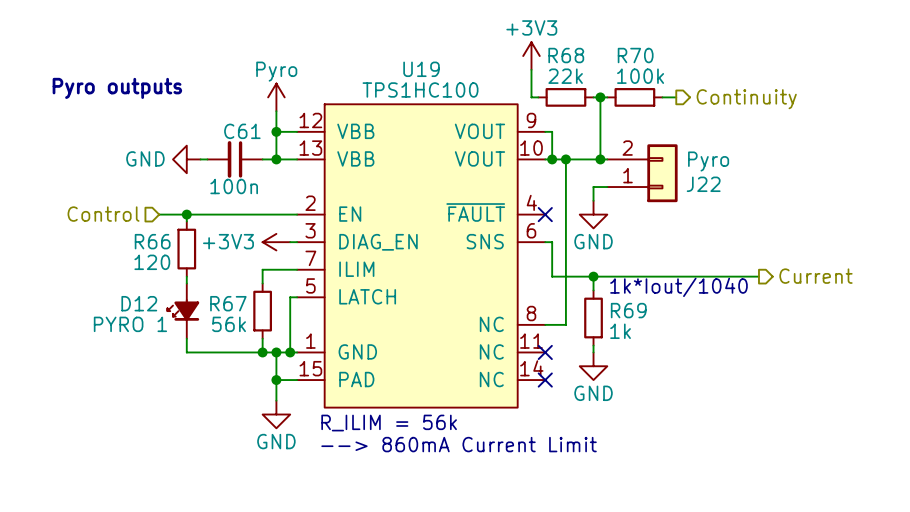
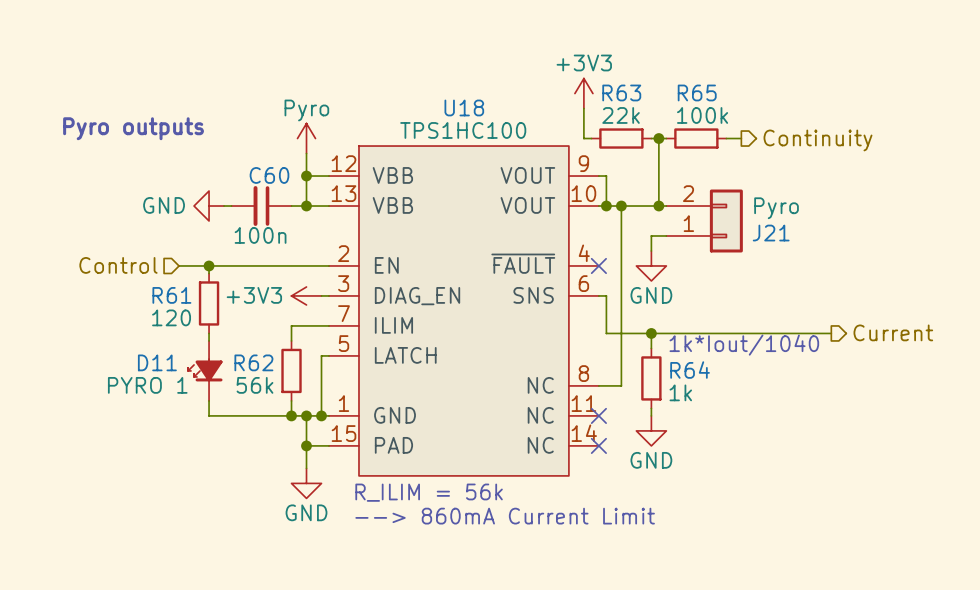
R68 name: R68 (566, 55) -> R63 (621, 92)
R70 name: R70 (635, 55) -> R65 (697, 92)
U19 name: U19 (421, 69) -> U18 (464, 107)
C61 name: C61 (242, 131) -> C60 (269, 175)
J22 name: J22 (703, 184) -> J21 (771, 233)
R66 name: R66 (152, 241) -> R61 (171, 295)
D12 name: D12 (139, 303) -> D11 (157, 362)
R67 name: R67 (228, 303) -> R62 (253, 362)
R69 name: R69 (628, 310) -> R64 (690, 370)

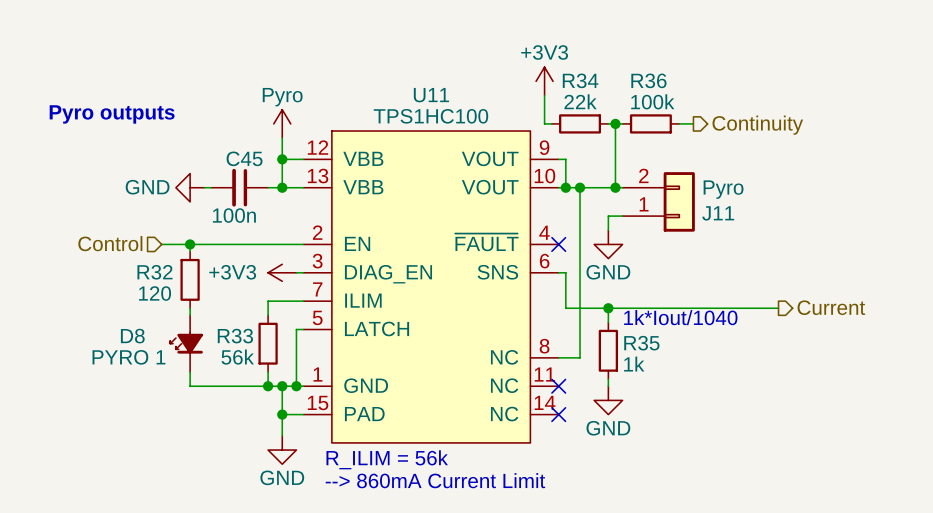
R63 name: R63 (621, 92) -> R34 (580, 80)
R65 name: R65 (697, 92) -> R36 (648, 80)
U18 name: U18 (464, 107) -> U11 (431, 95)
C60 name: C60 (269, 175) -> C45 (244, 158)
J21 name: J21 (771, 233) -> J11 (718, 213)
R61 name: R61 (171, 295) -> R32 (154, 272)
D11 name: D11 (157, 362) -> D8 (132, 336)
R62 name: R62 (253, 362) -> R33 (235, 336)
R64 name: R64 (690, 370) -> R35 (641, 343)

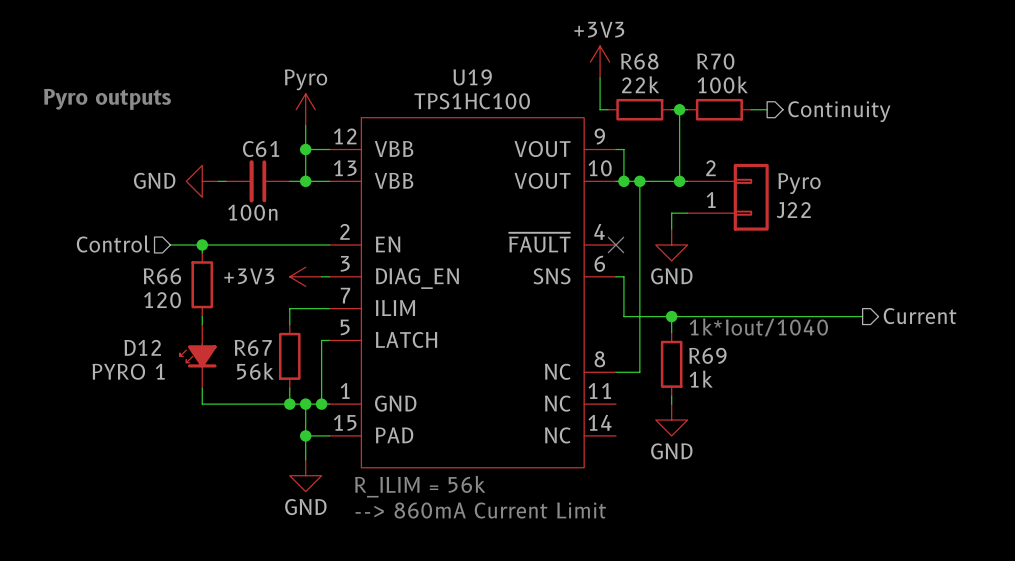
R34 name: R34 (580, 80) -> R68 (639, 61)
R36 name: R36 (648, 80) -> R70 (715, 61)
U11 name: U11 (431, 95) -> U19 (472, 77)
C45 name: C45 (244, 158) -> C61 (261, 149)
J11 name: J11 (718, 213) -> J22 (793, 210)
R32 name: R32 (154, 272) -> R66 (162, 276)
D8 name: D8 (132, 336) -> D12 (142, 347)
R33 name: R33 (235, 336) -> R67 (253, 347)
R35 name: R35 (641, 343) -> R69 (707, 355)
no-connect mark: (558, 386) -> none
no-connect mark: (558, 414) -> none

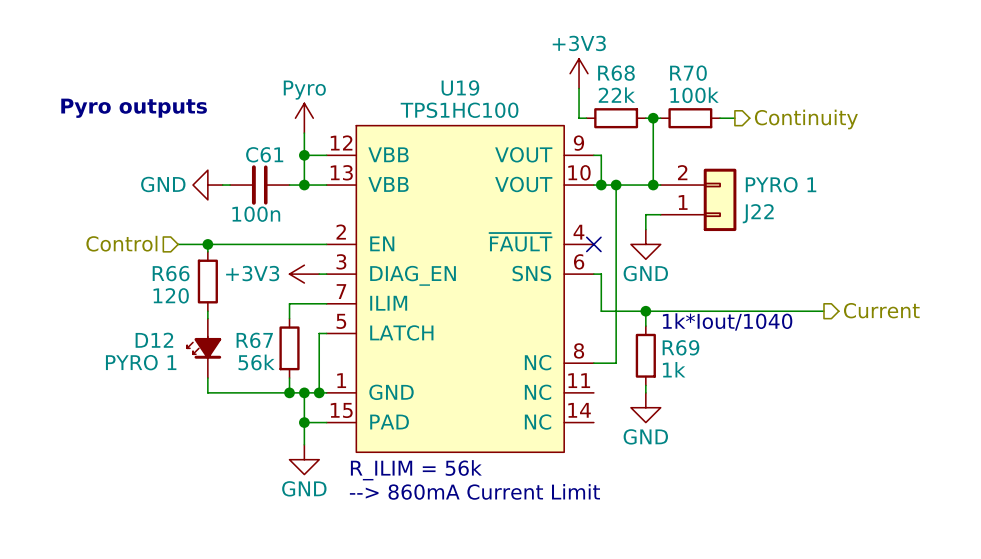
J22 value: Pyro (799, 183) -> PYRO 1 (781, 184)

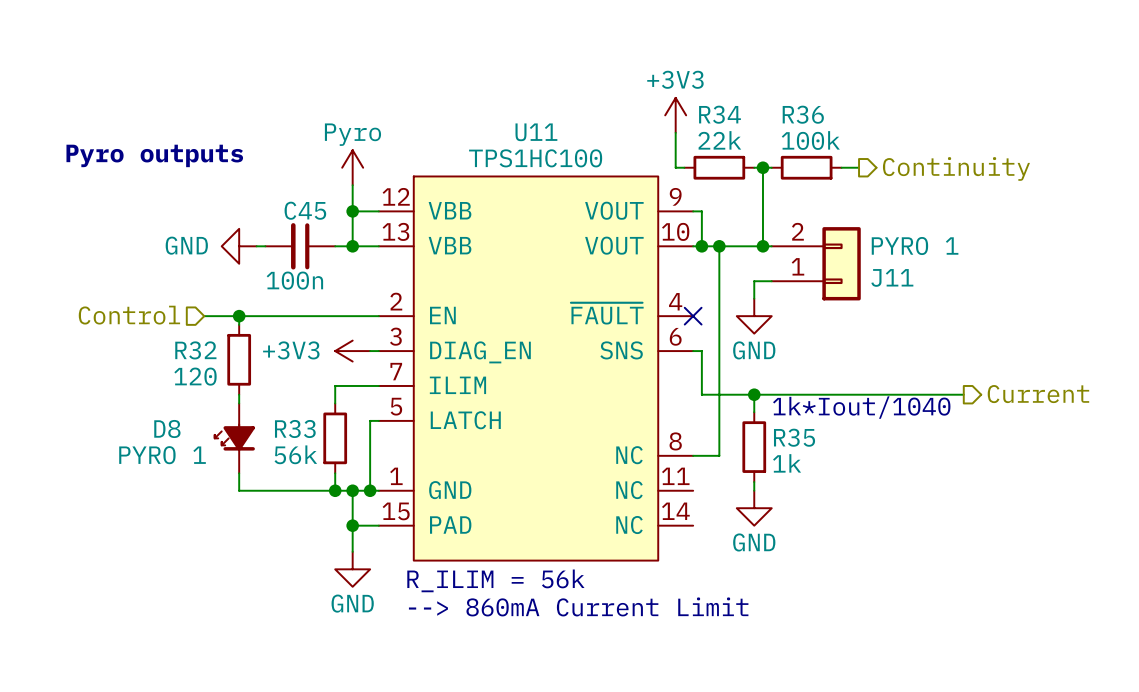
R68 name: R68 (616, 73) -> R34 (719, 114)
R70 name: R70 (688, 73) -> R36 (803, 114)
U19 name: U19 (460, 87) -> U11 (536, 132)
C61 name: C61 (264, 154) -> C45 (305, 210)
J22 name: J22 (758, 213) -> J11 (892, 277)
R66 name: R66 (171, 273) -> R32 (195, 350)
D12 name: D12 (154, 340) -> D8 (167, 428)
R67 name: R67 (254, 340) -> R33 (295, 428)
R69 name: R69 (680, 347) -> R35 (794, 437)

